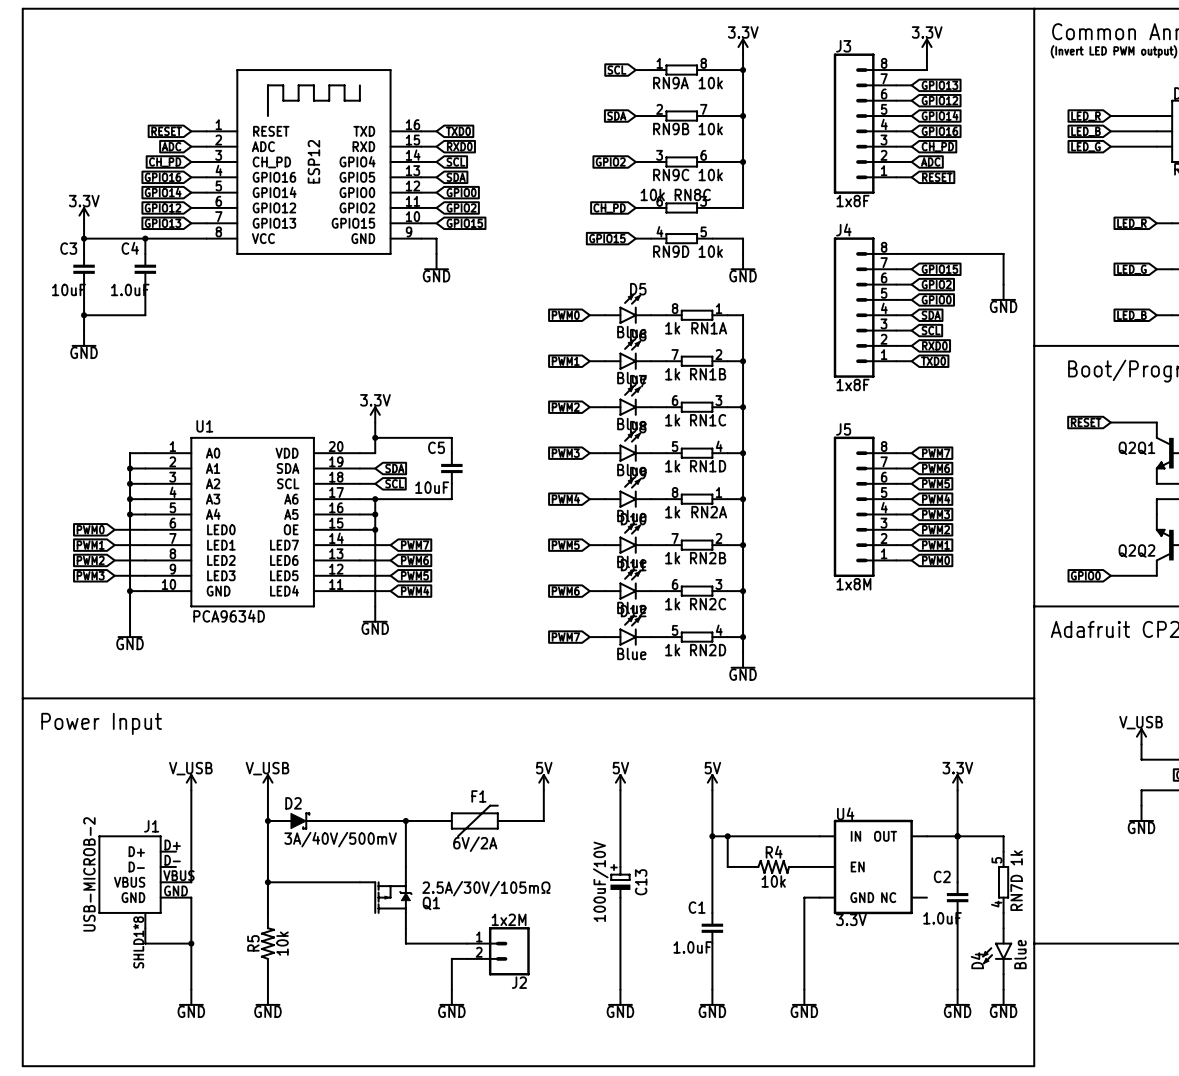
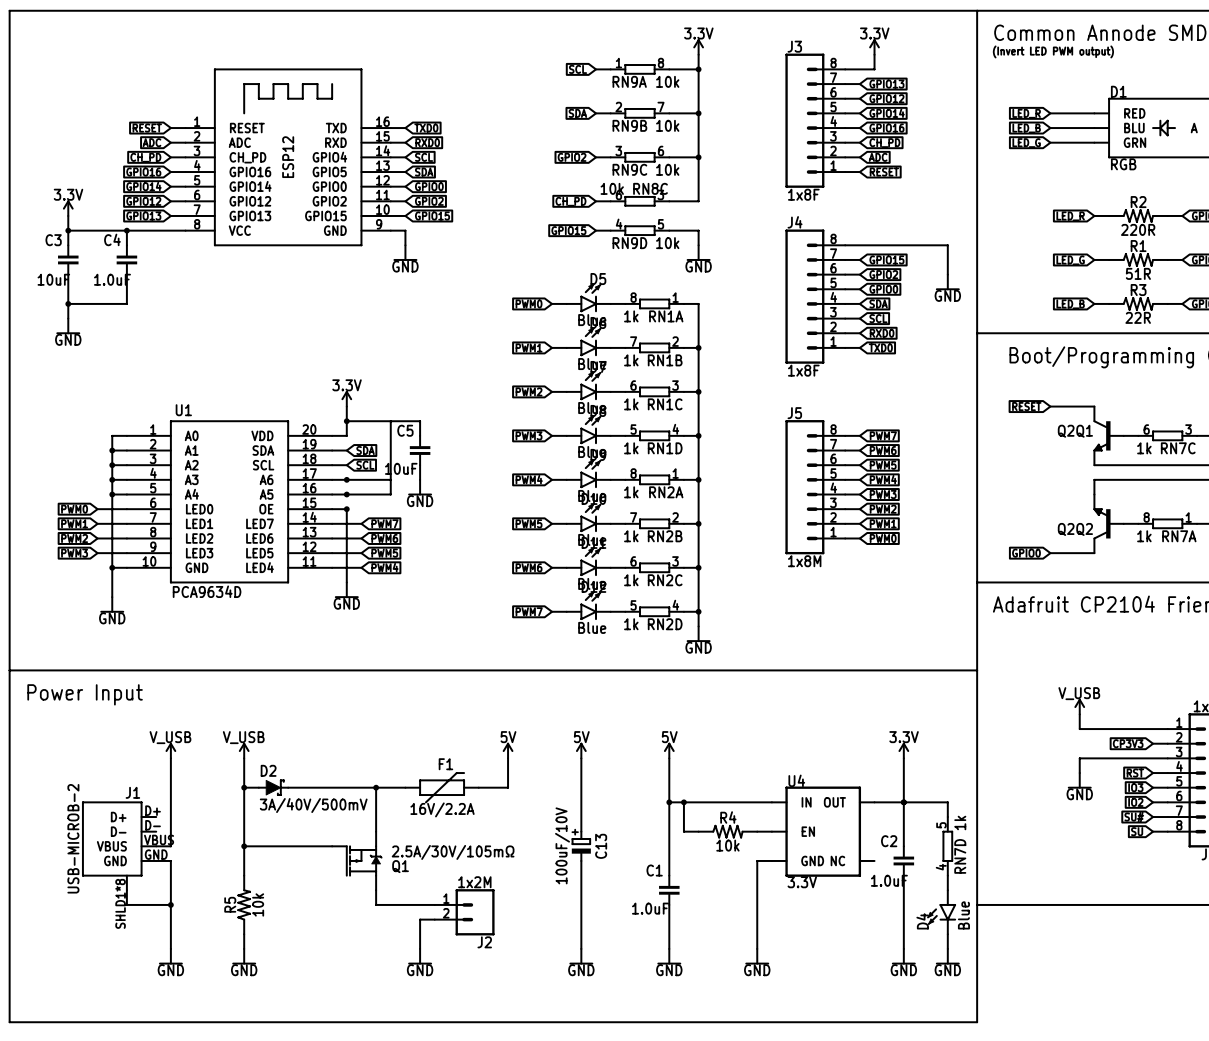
wire: none -> (390, 421) (390, 494) (346, 494)
wire: (375, 499) (375, 529) -> none
wire: (421, 499) (451, 499) -> none
power symbol: none -> GND (420, 487)
F1 value: 6V/2A (475, 844) -> 16V/2.2A (442, 809)

